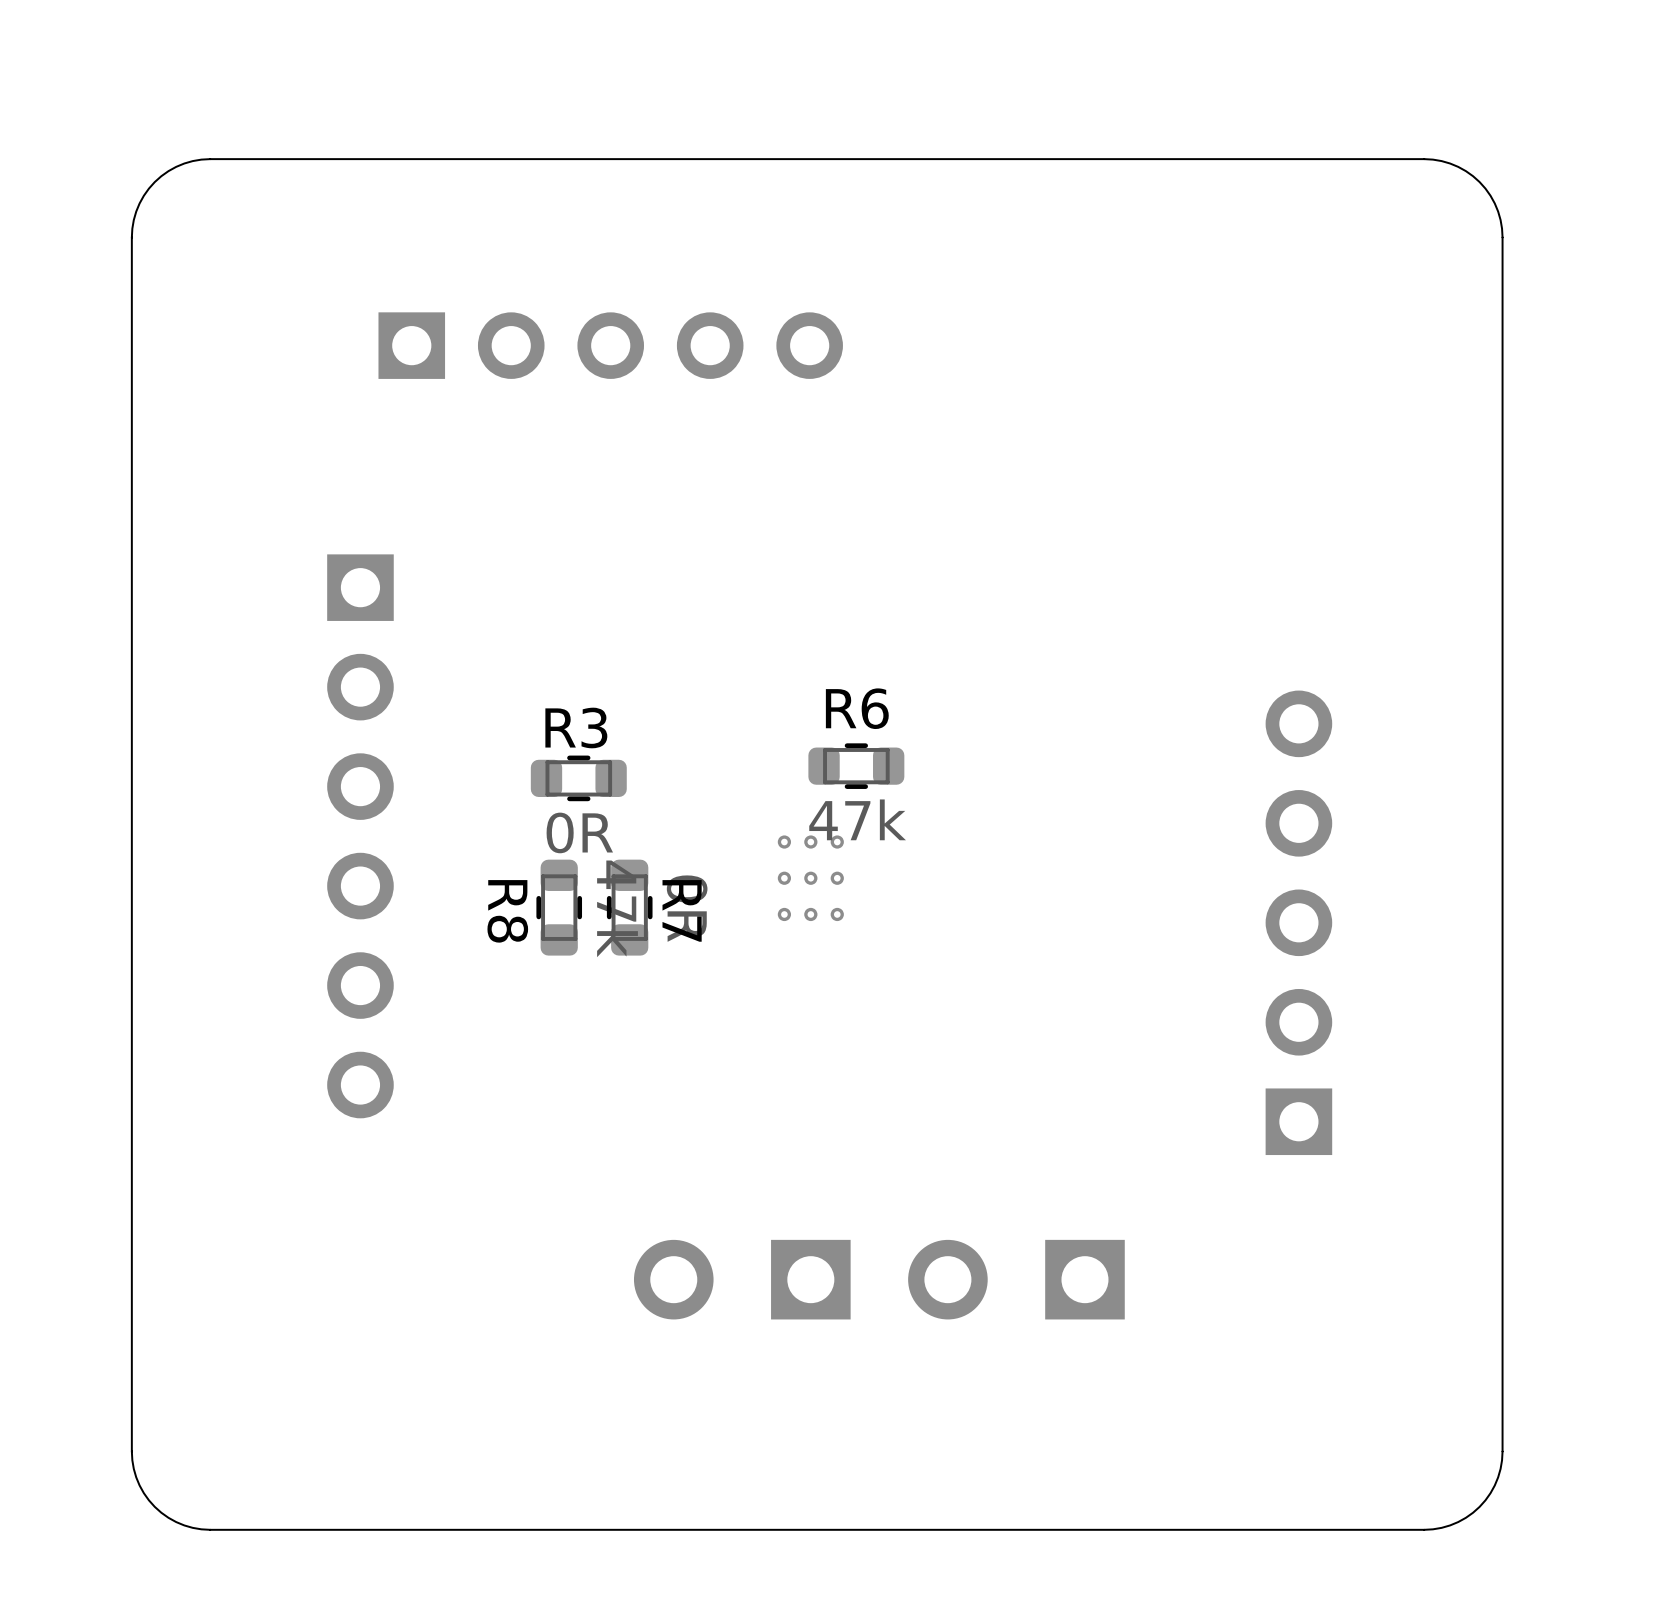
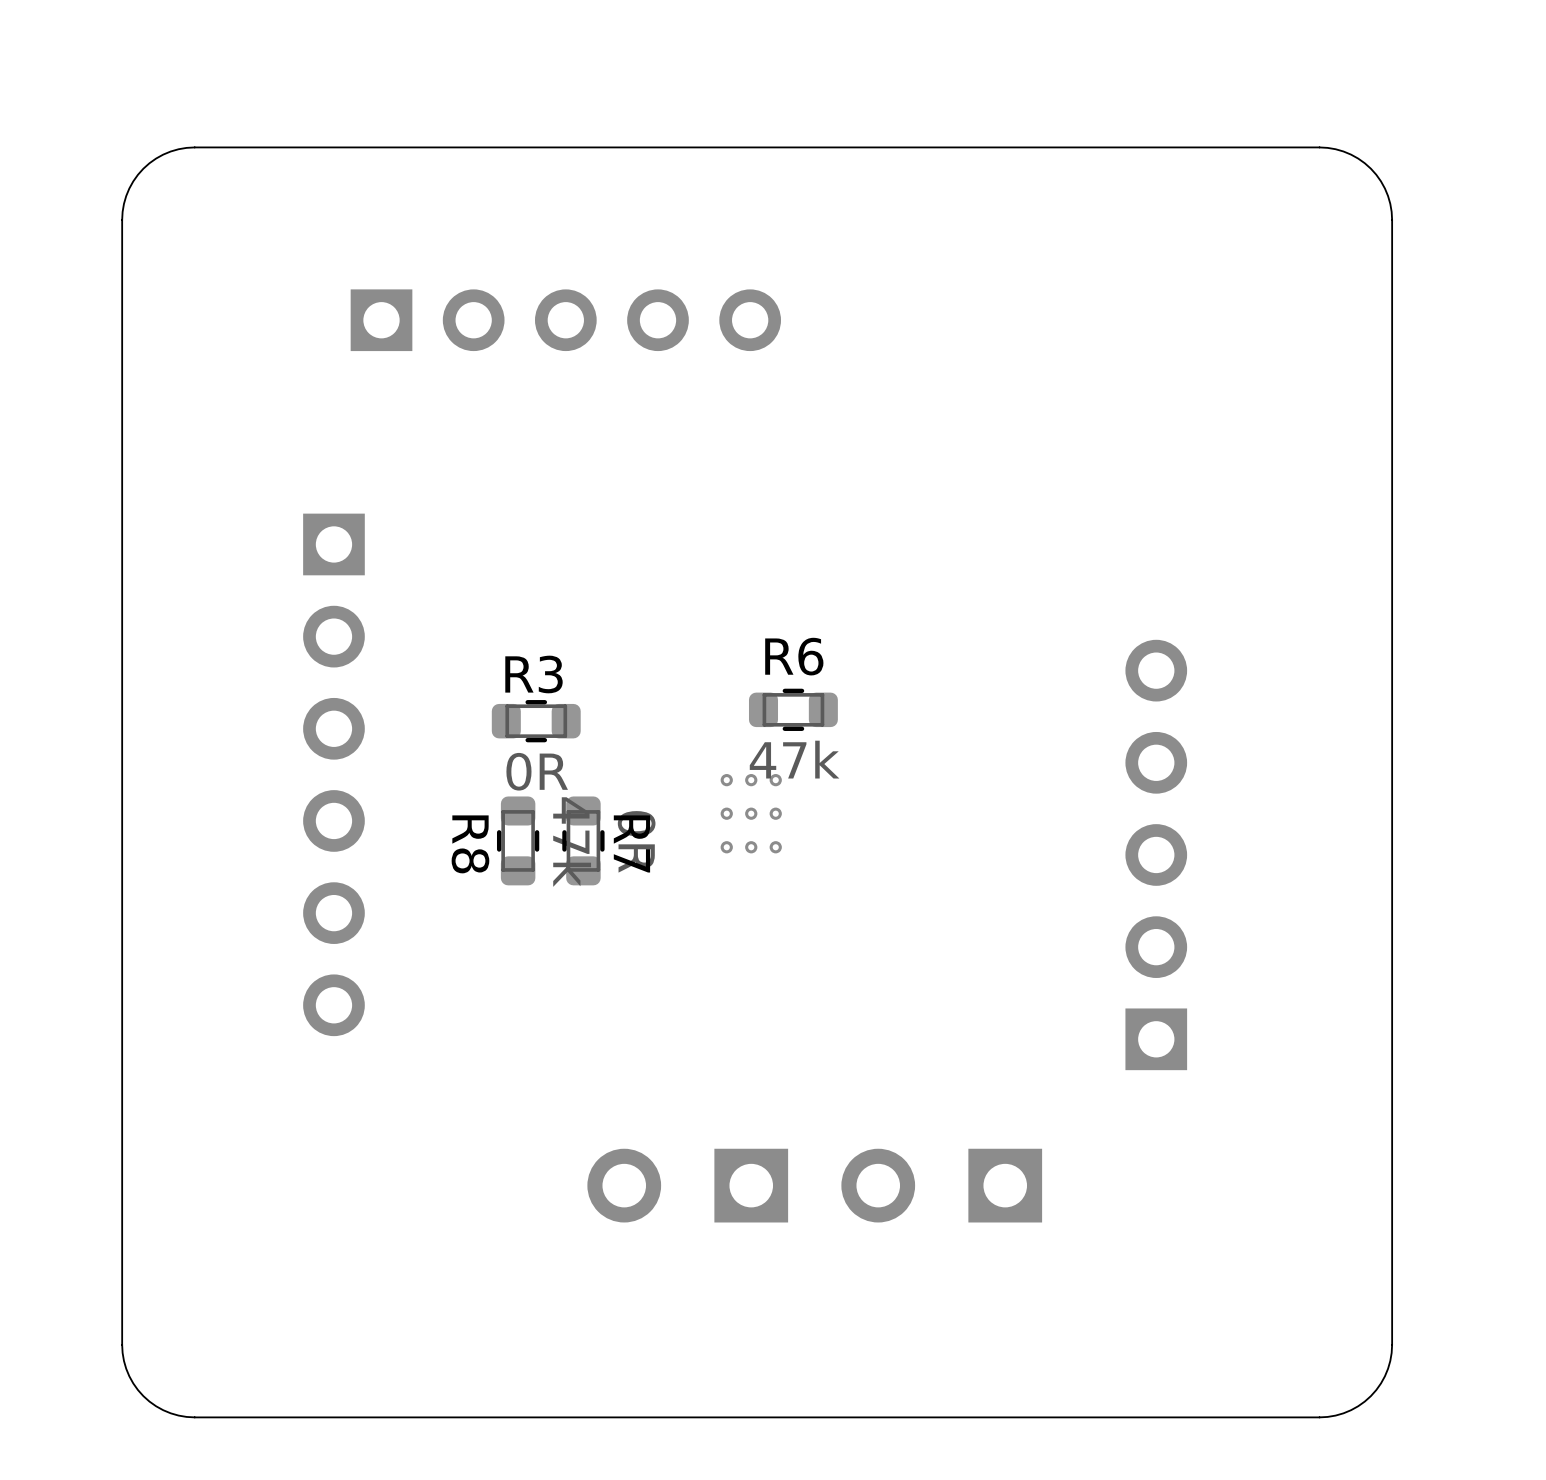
part position: (1298, 922) -> (1156, 854)

